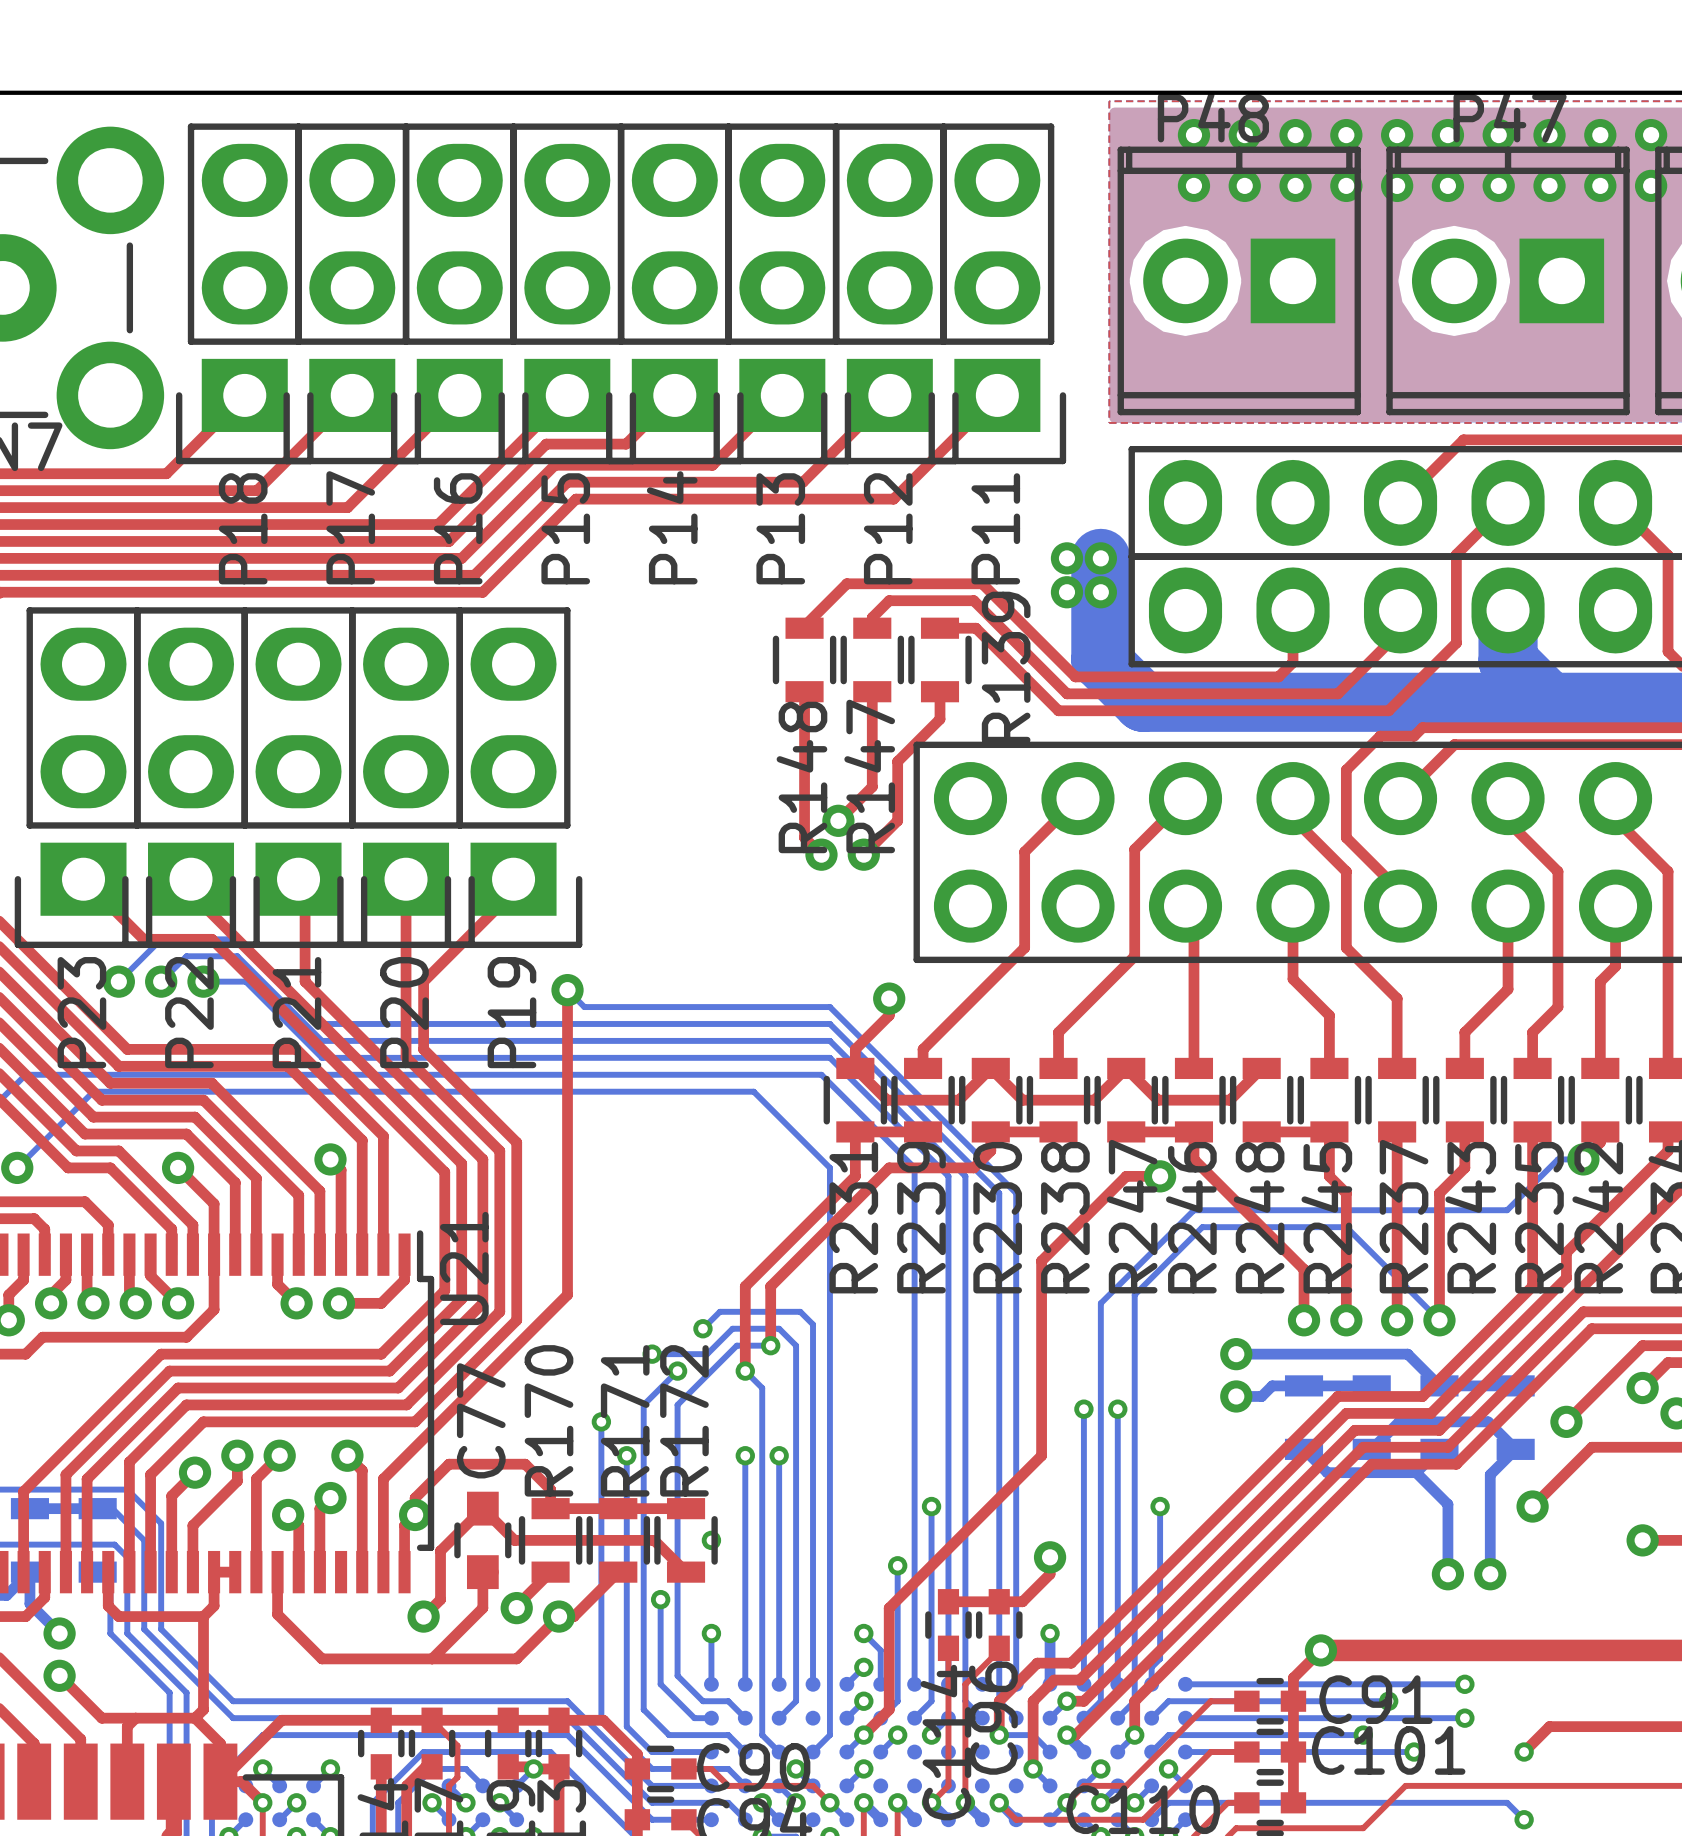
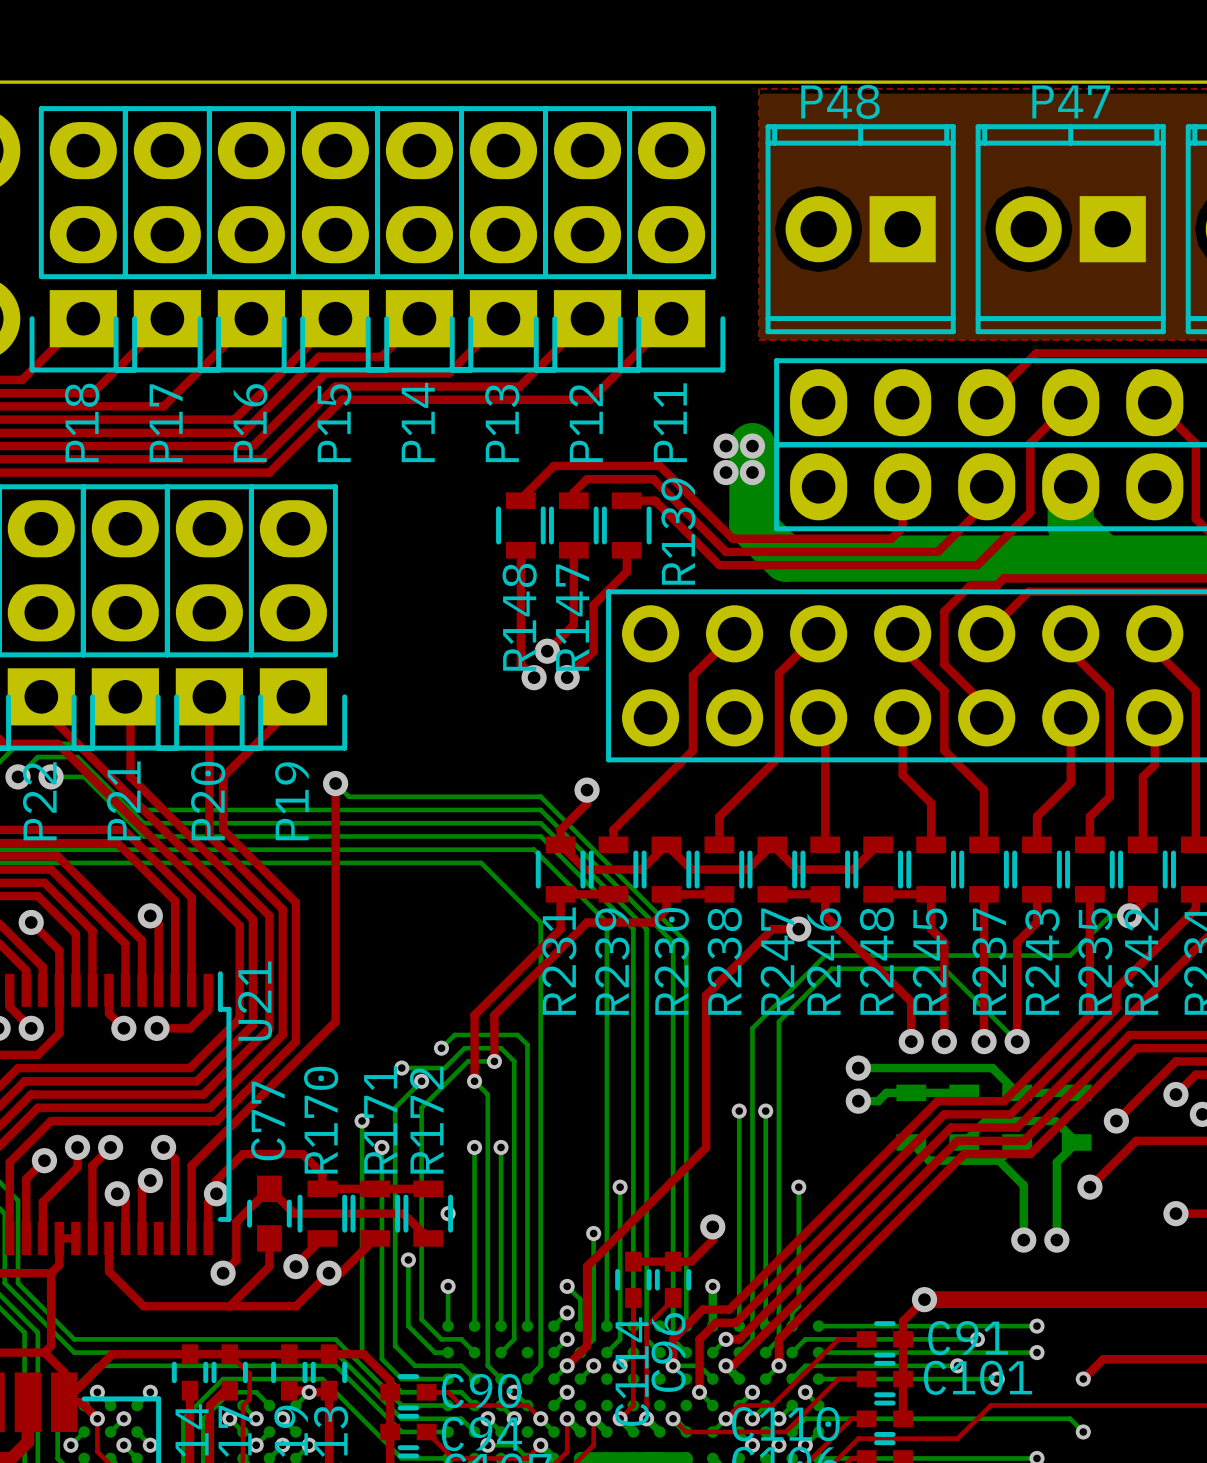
part: (1193, 135) -> none
part: (1244, 135) -> none
part: (1295, 135) -> none
part: (1346, 135) -> none
part: (1397, 135) -> none
part: (1447, 135) -> none
part: (1498, 135) -> none
part: (1549, 135) -> none
part: (1600, 135) -> none
part: (1651, 135) -> none
part: (1193, 185) -> none
part: (1244, 185) -> none
part: (1295, 185) -> none
part: (1346, 185) -> none
part: (1397, 185) -> none
part: (1447, 185) -> none
part: (1498, 185) -> none
part: (1549, 185) -> none
part: (1600, 185) -> none
part: (1651, 185) -> none

